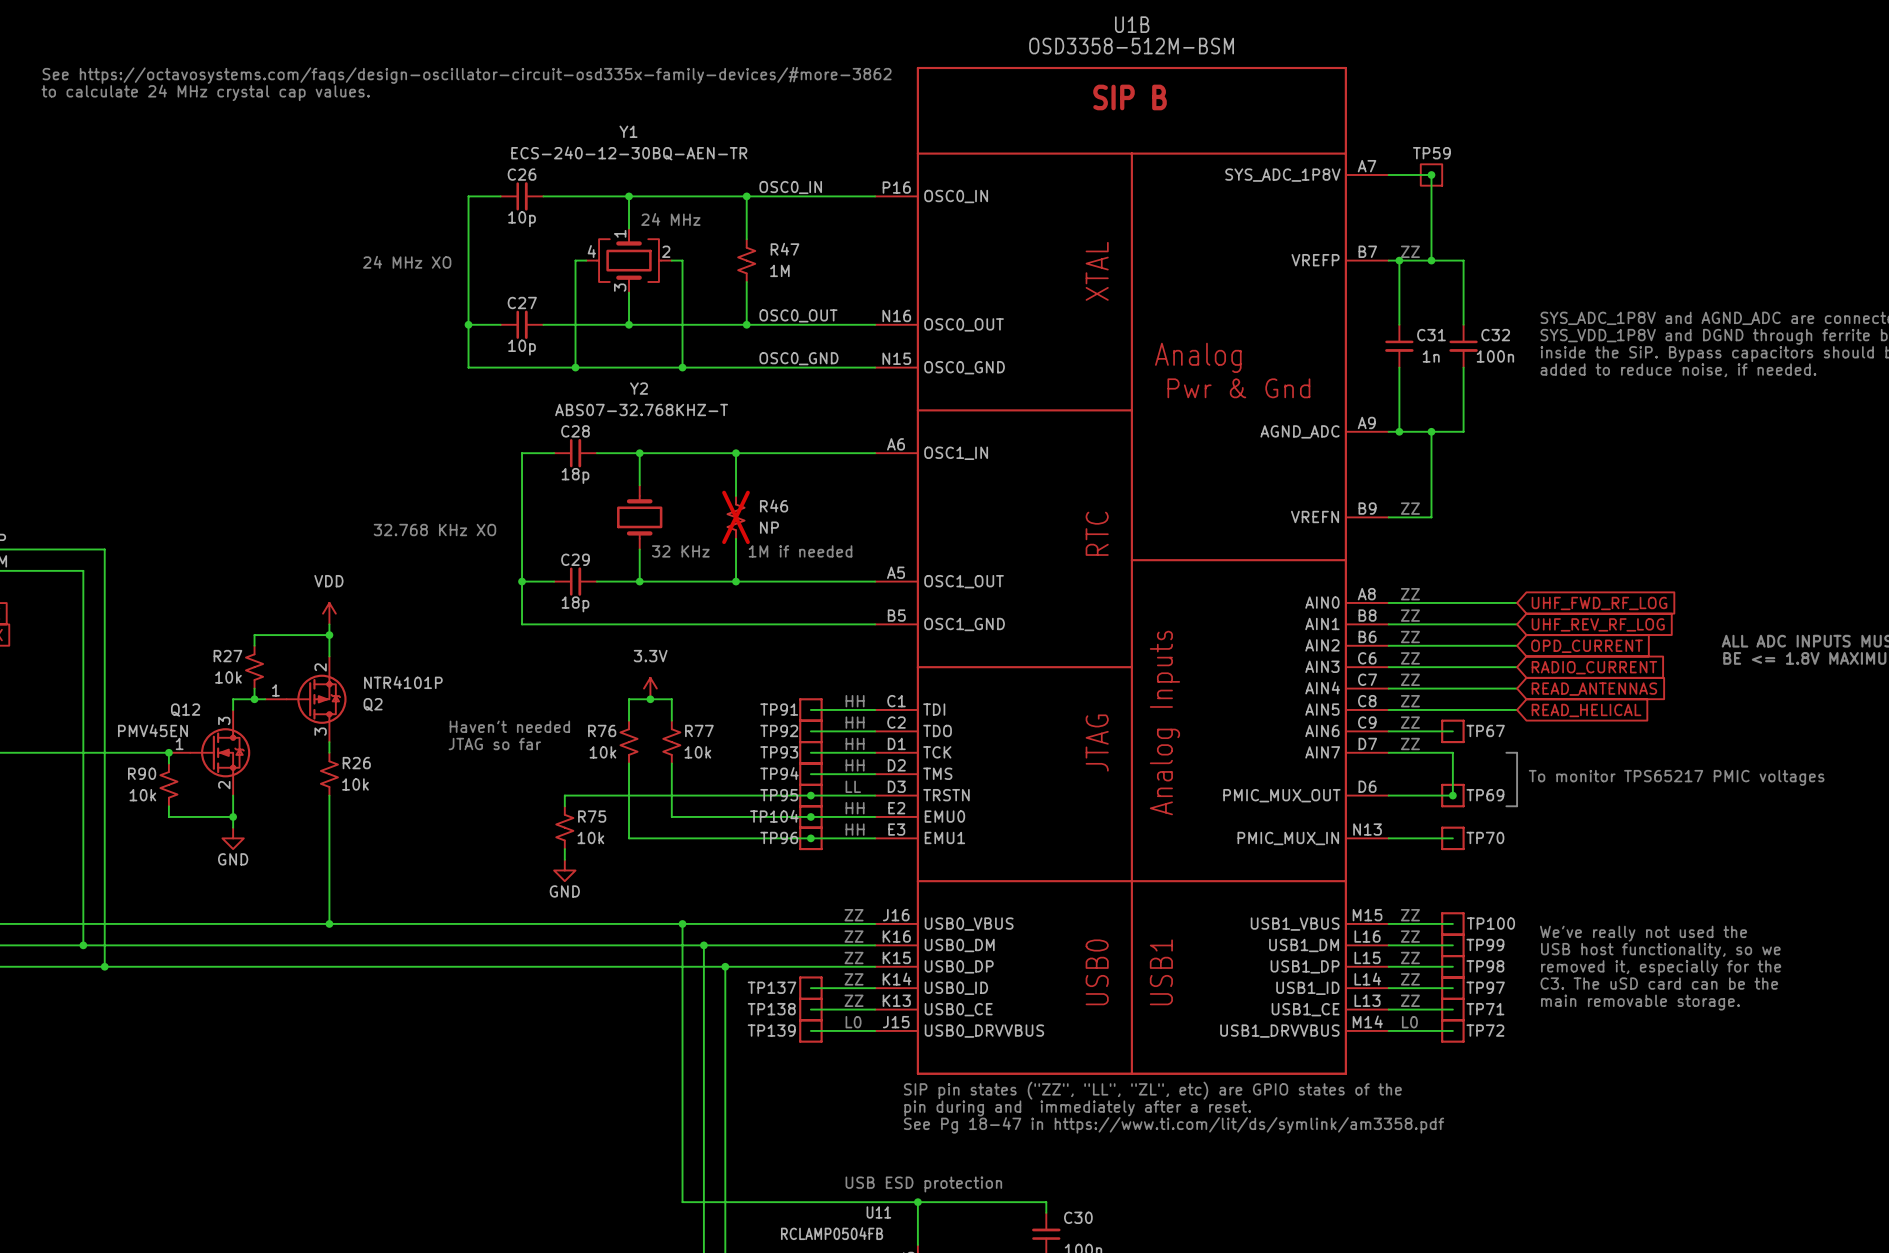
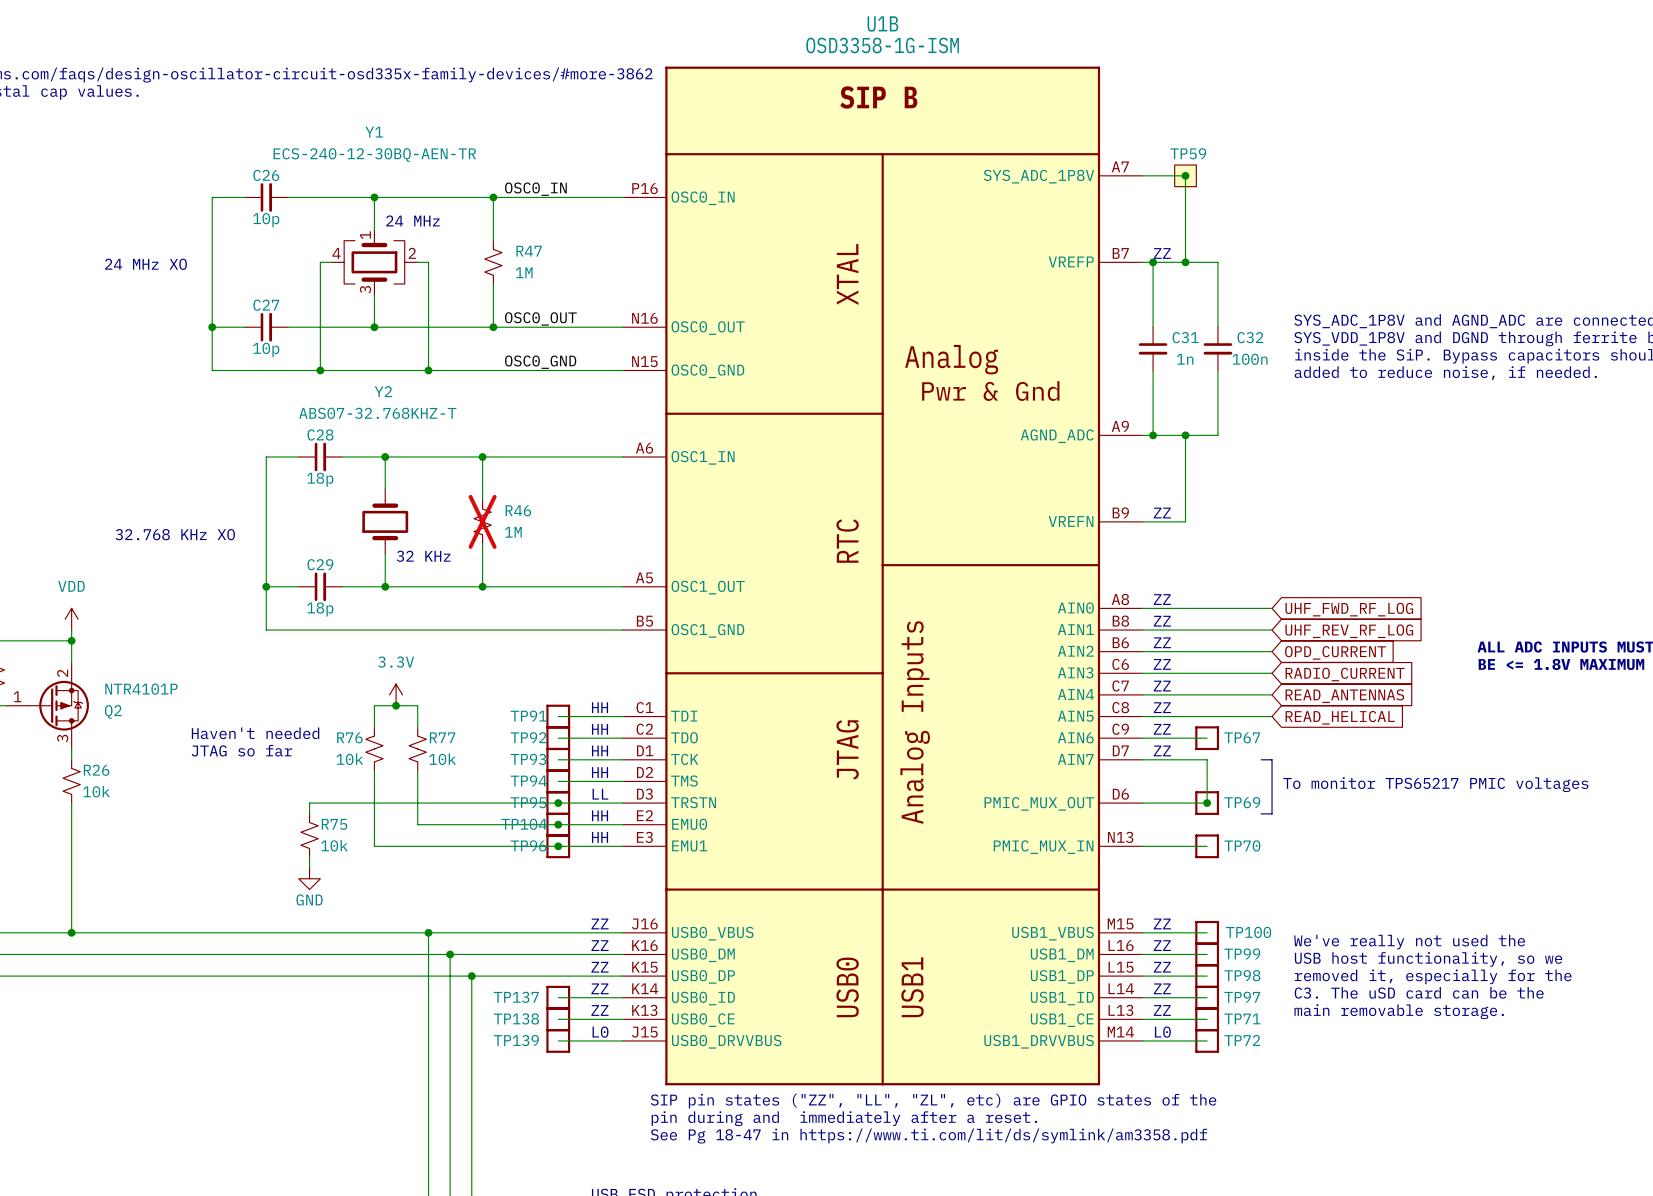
U1B value: OSD3358-512M-BSM (1131, 46) -> OSD3358-1G-ISM (882, 45)
R46 value: NP (769, 527) -> 1M (513, 532)
text: 1M if needed (800, 551) -> none

